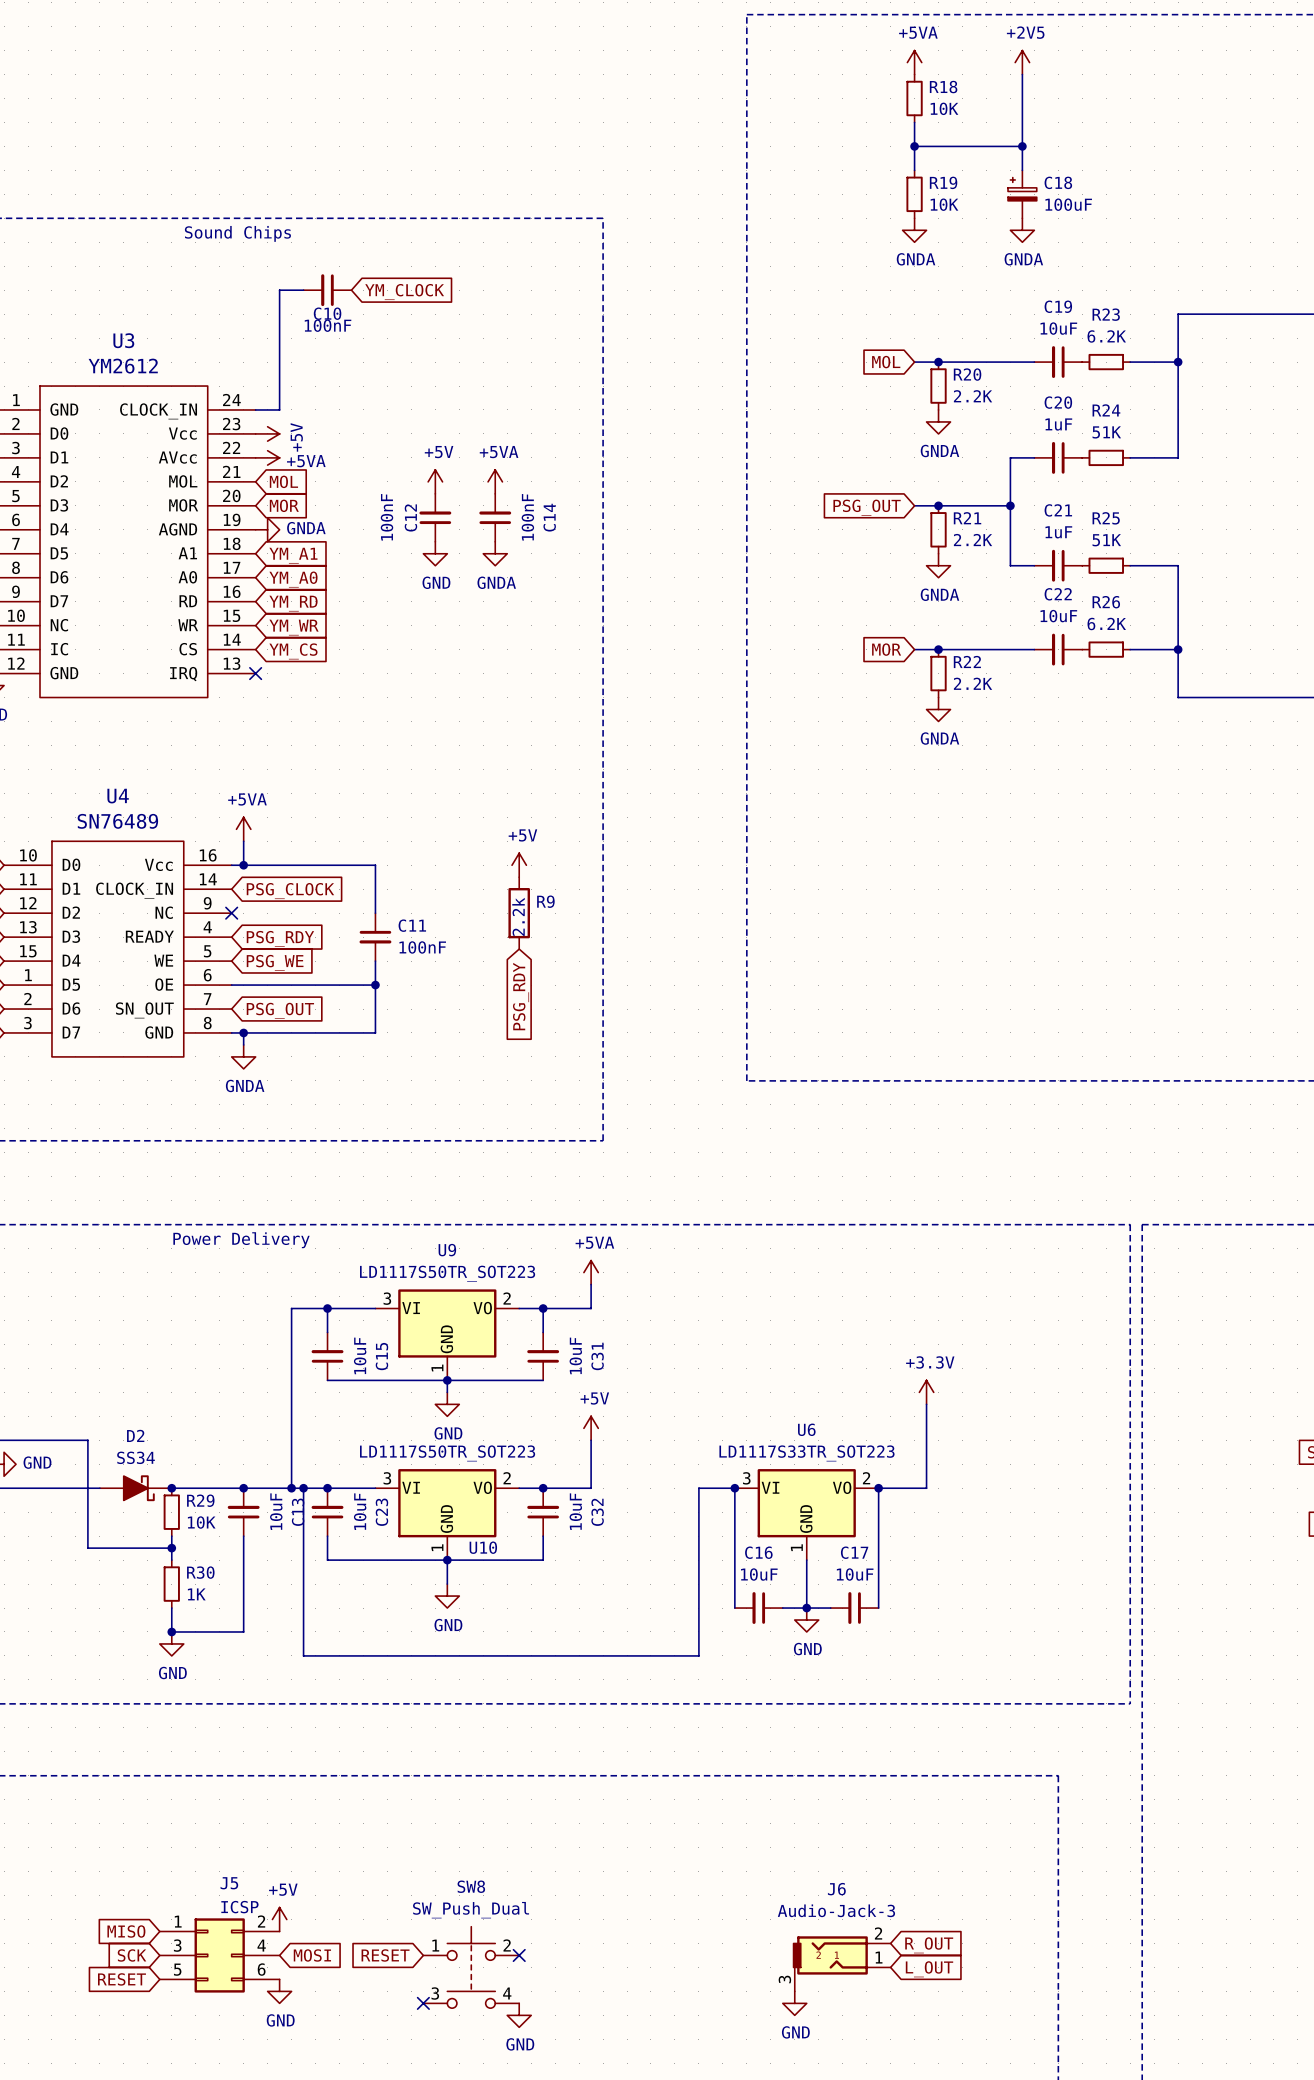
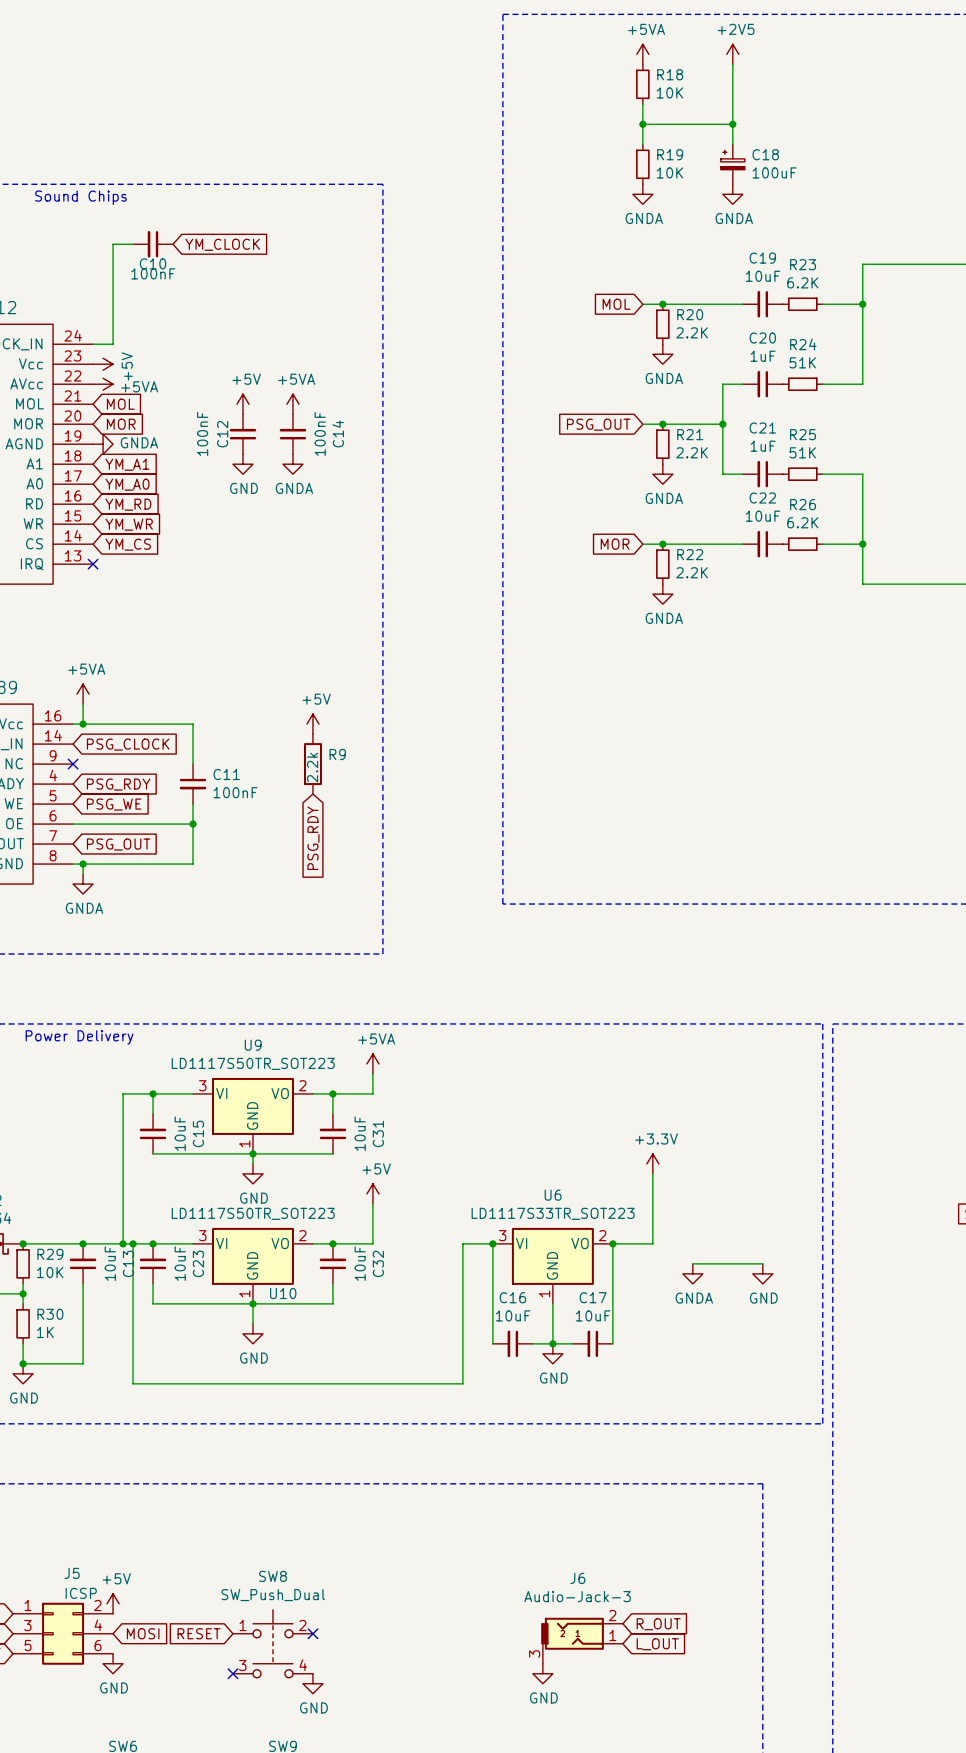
wire: none -> (692, 1263) (762, 1263)
power symbol: none -> GNDA (692, 1273)
power symbol: none -> GND (762, 1273)

